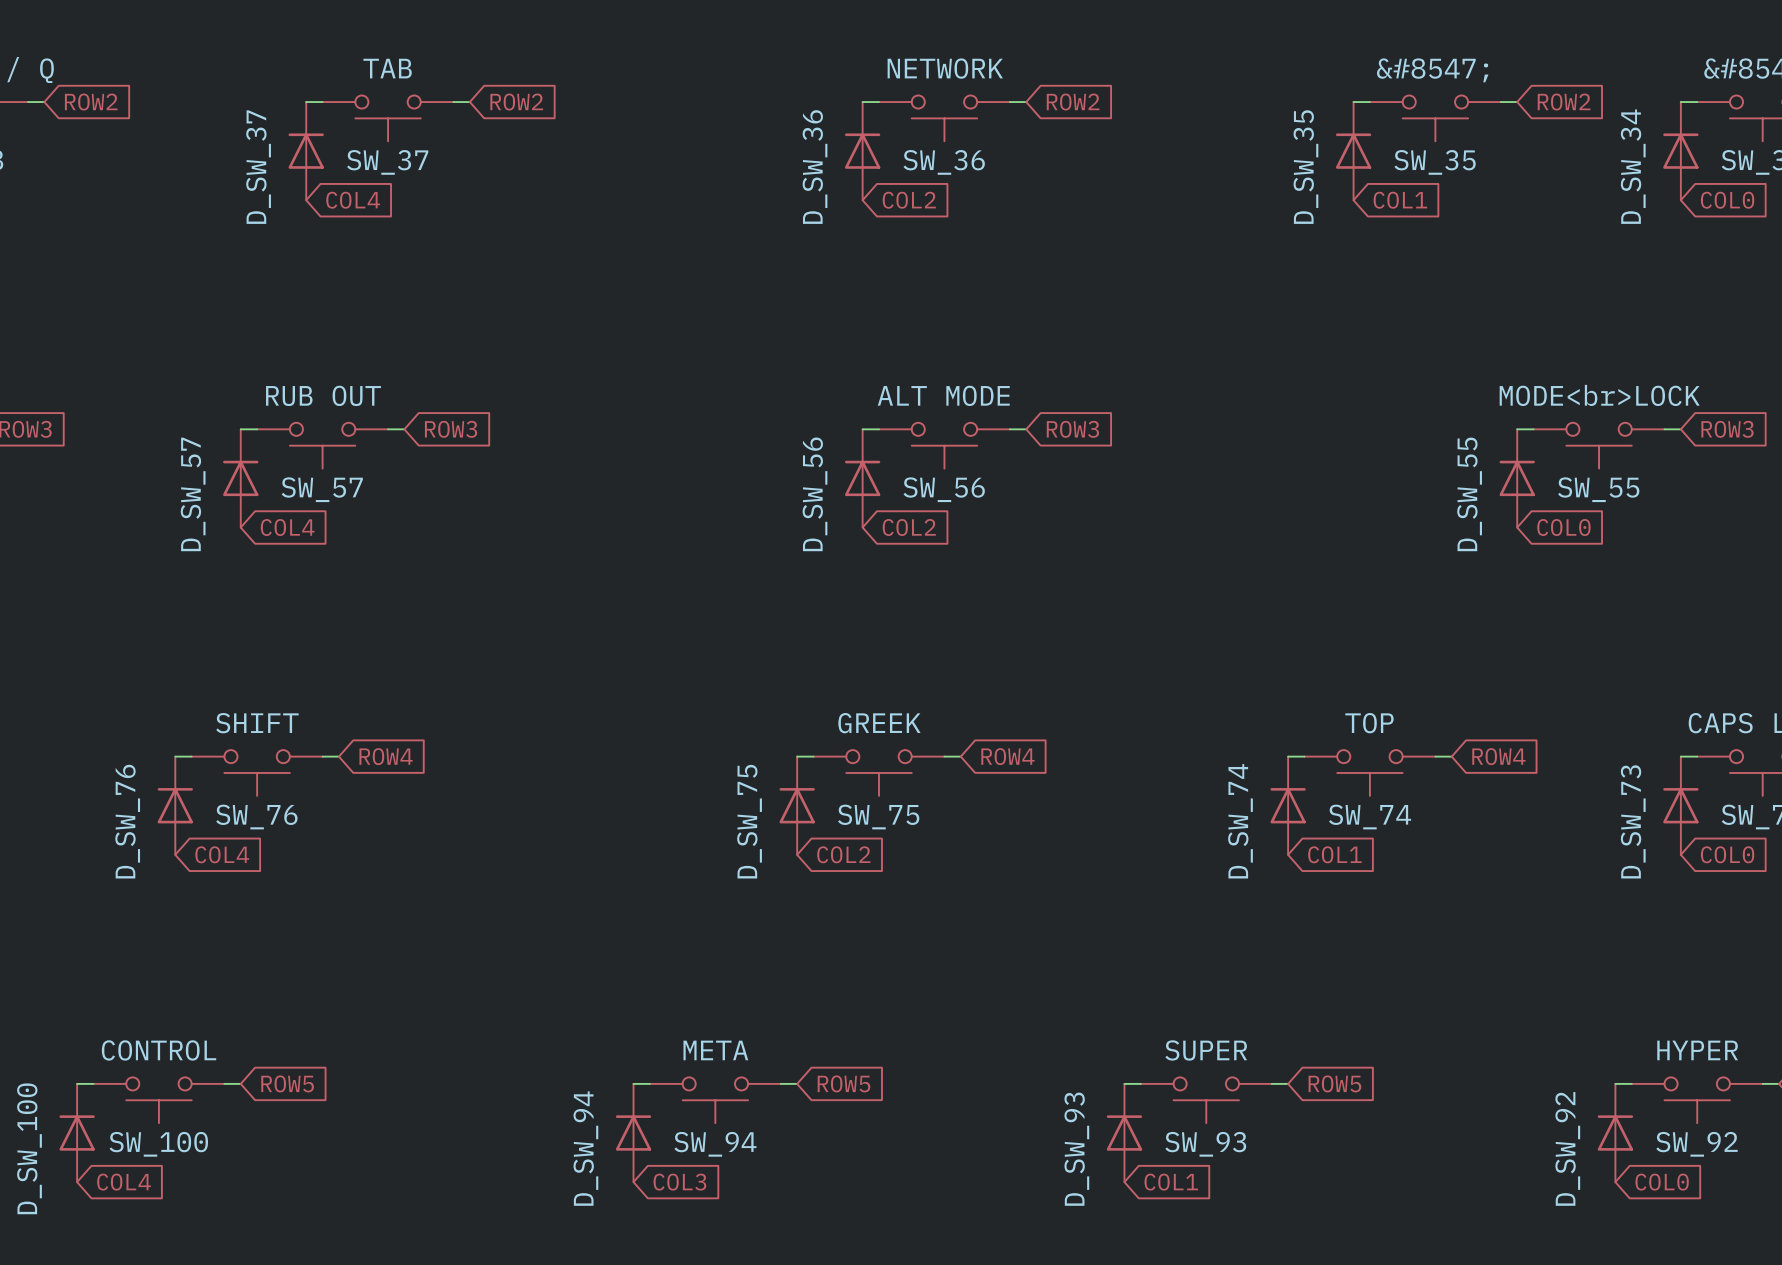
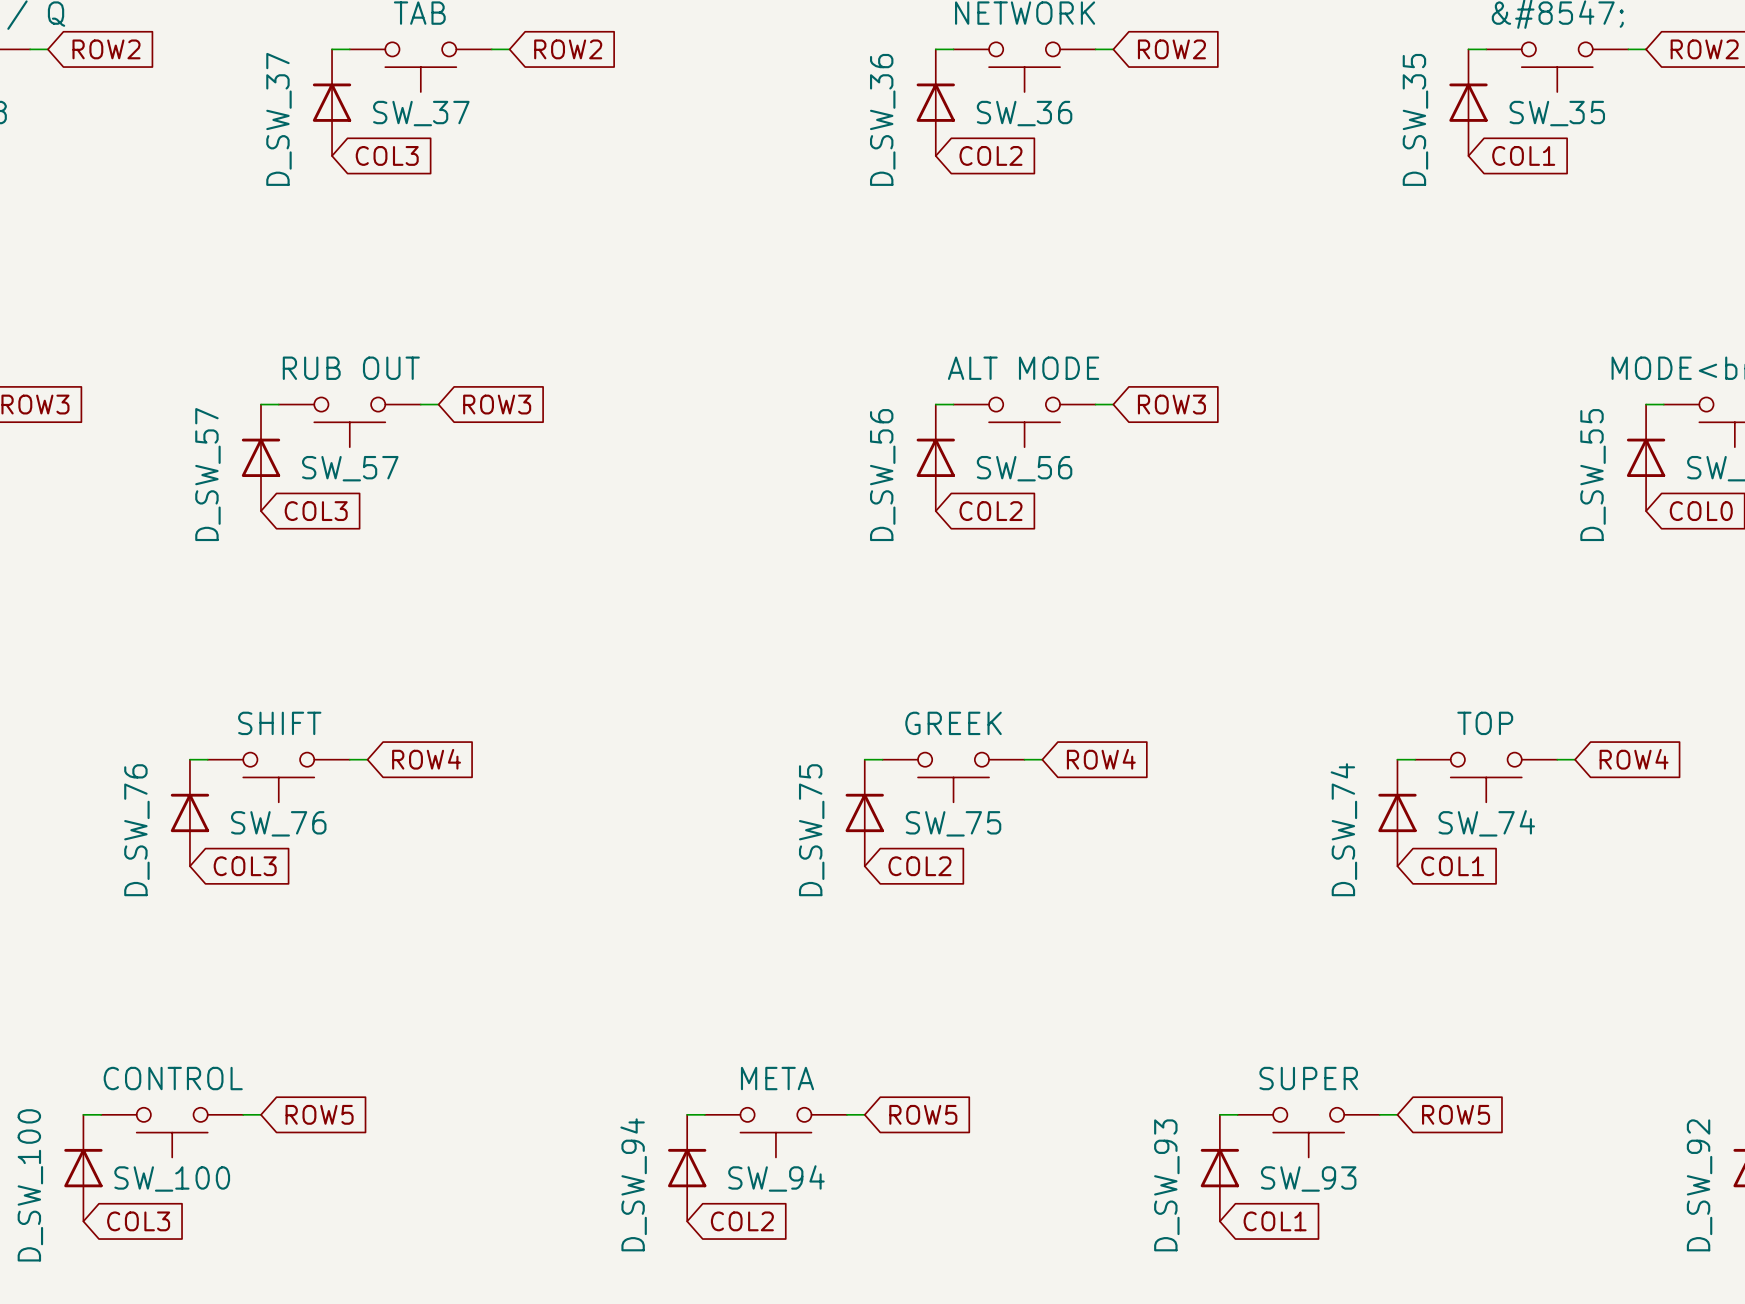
global label: COL4 (353, 200) -> COL3 (387, 155)
global label: COL4 (287, 527) -> COL3 (316, 511)
global label: COL4 (222, 854) -> COL3 (245, 866)
global label: COL4 (124, 1182) -> COL3 (138, 1221)
global label: COL3 (679, 1182) -> COL2 (742, 1221)

